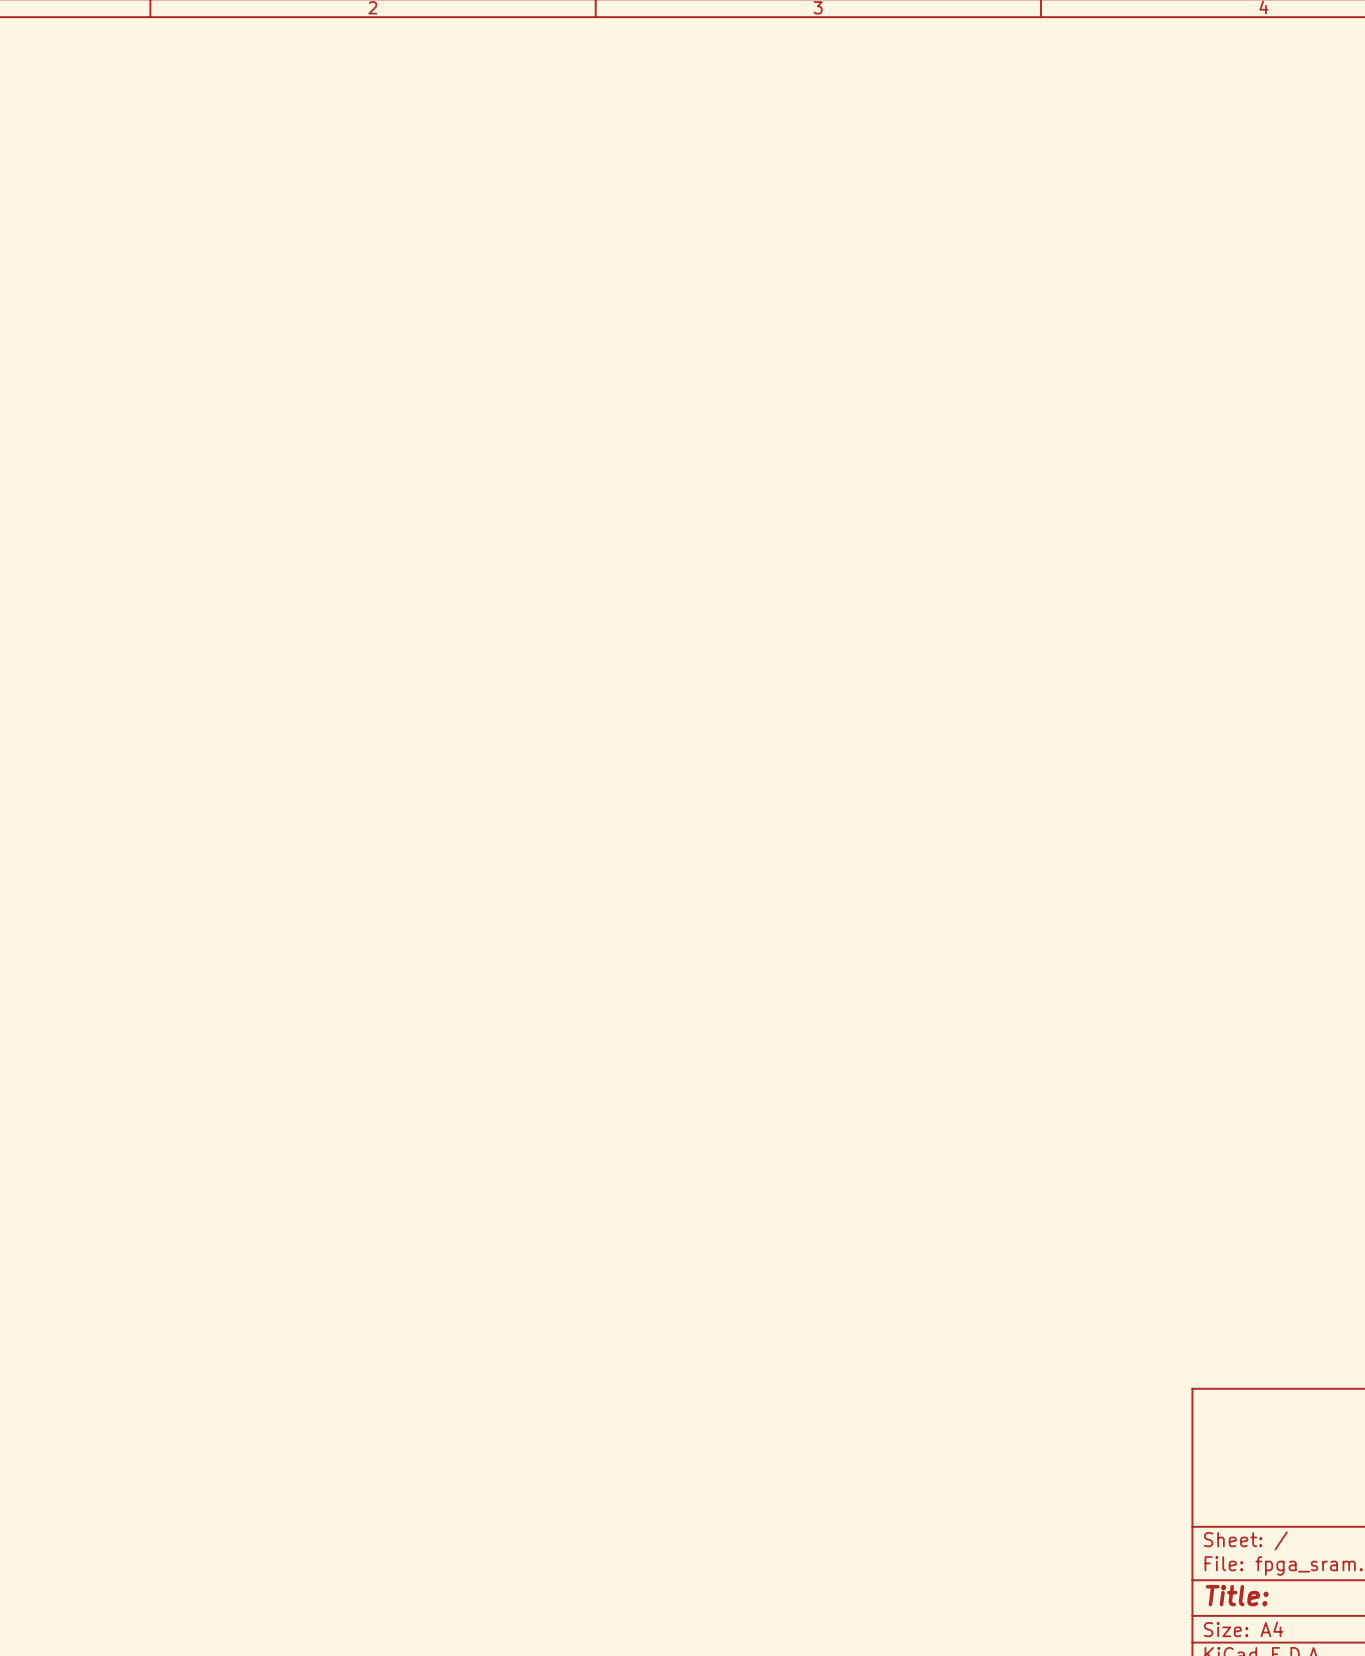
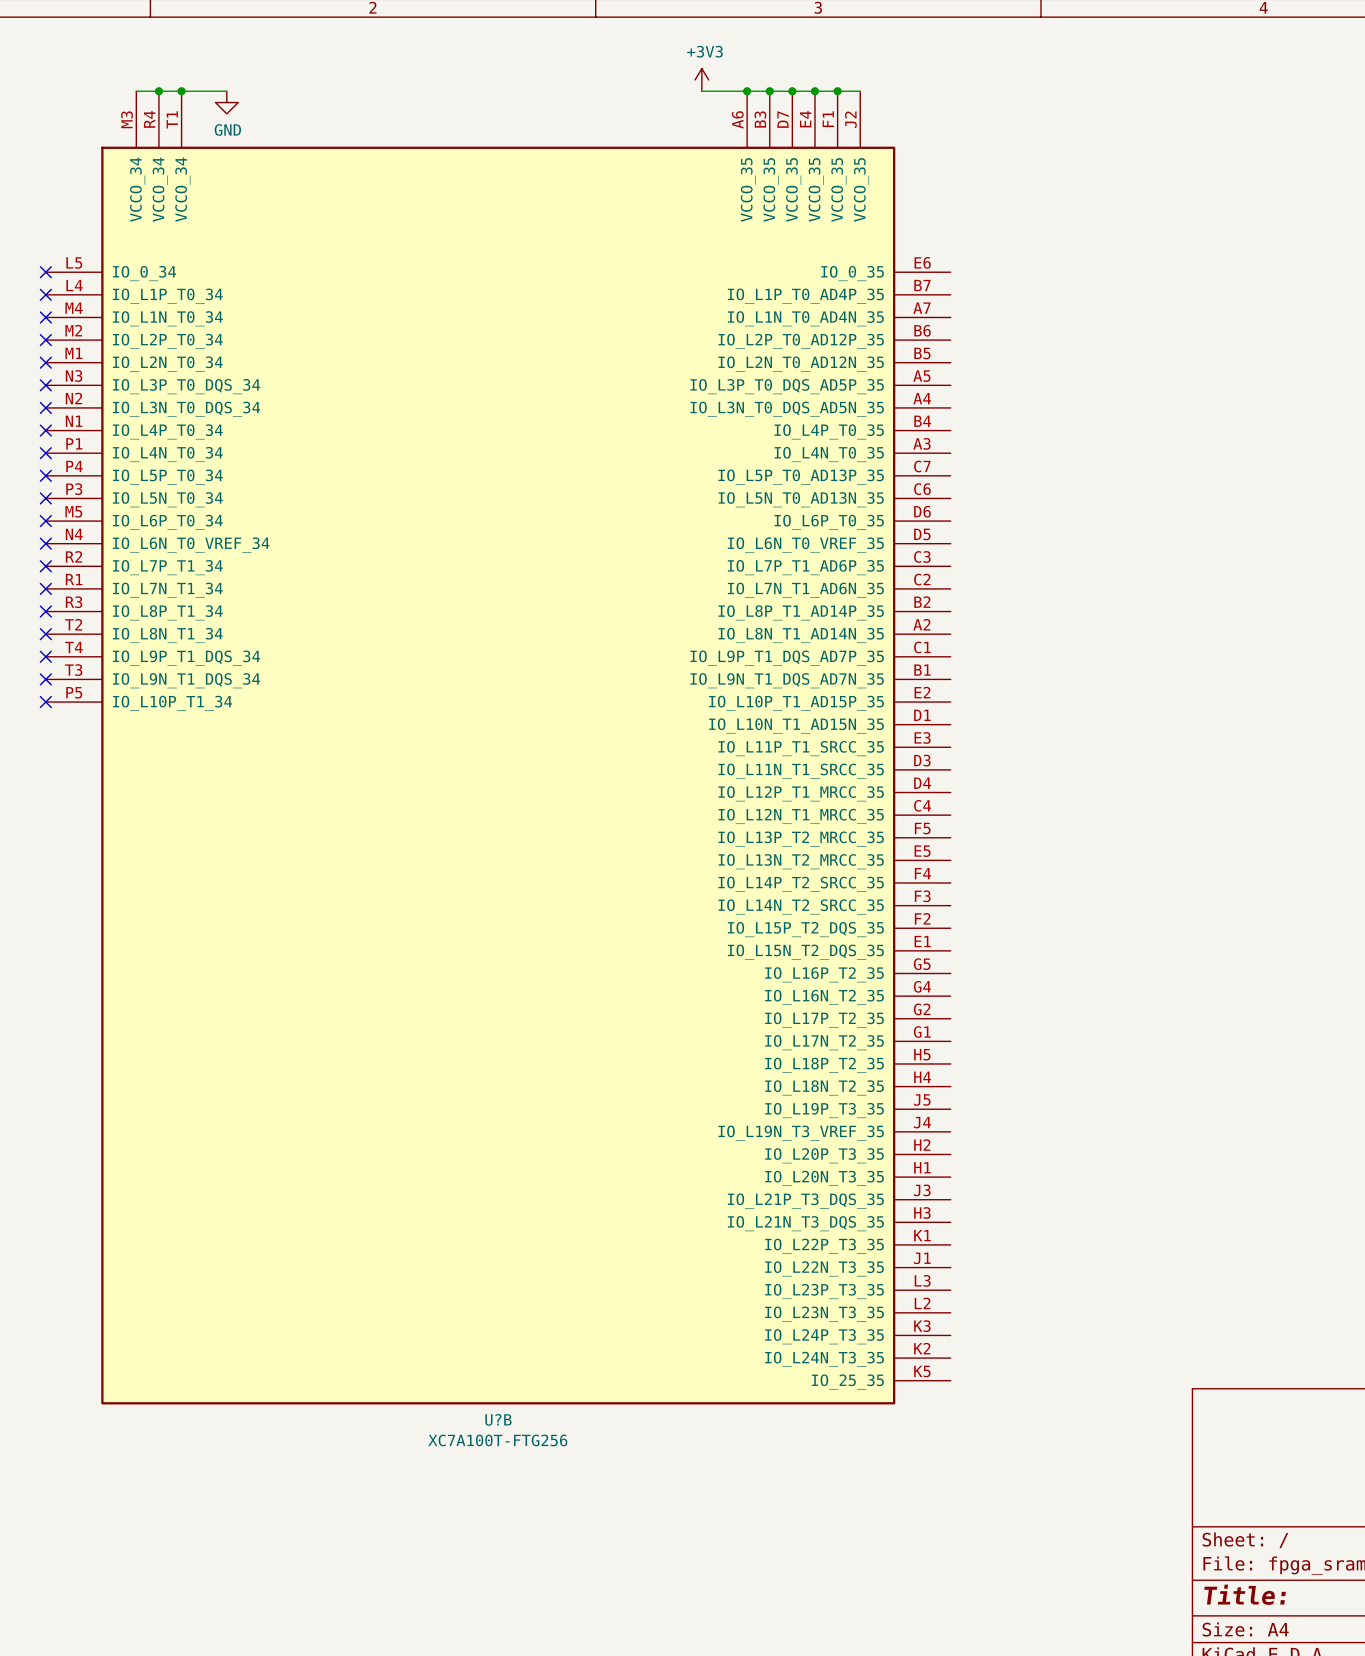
power symbol: none -> +3V3 (701, 79)
wire: none -> (136, 91) (226, 91)
junction: none -> (158, 91)
junction: none -> (181, 91)
wire: none -> (701, 91) (860, 91)
junction: none -> (747, 91)
junction: none -> (769, 91)
junction: none -> (792, 91)
junction: none -> (814, 91)
junction: none -> (837, 91)
power symbol: none -> GND (226, 102)
no-connect mark: none -> (45, 272)
no-connect mark: none -> (45, 294)
no-connect mark: none -> (45, 317)
no-connect mark: none -> (45, 340)
no-connect mark: none -> (45, 362)
no-connect mark: none -> (45, 385)
no-connect mark: none -> (45, 407)
no-connect mark: none -> (45, 430)
no-connect mark: none -> (45, 453)
no-connect mark: none -> (45, 475)
no-connect mark: none -> (45, 498)
no-connect mark: none -> (45, 521)
no-connect mark: none -> (45, 543)
no-connect mark: none -> (45, 566)
no-connect mark: none -> (45, 588)
no-connect mark: none -> (45, 611)
no-connect mark: none -> (45, 634)
no-connect mark: none -> (45, 656)
no-connect mark: none -> (45, 679)
no-connect mark: none -> (45, 702)
U?B: none -> XC7A100T-FTG256 (498, 747)

